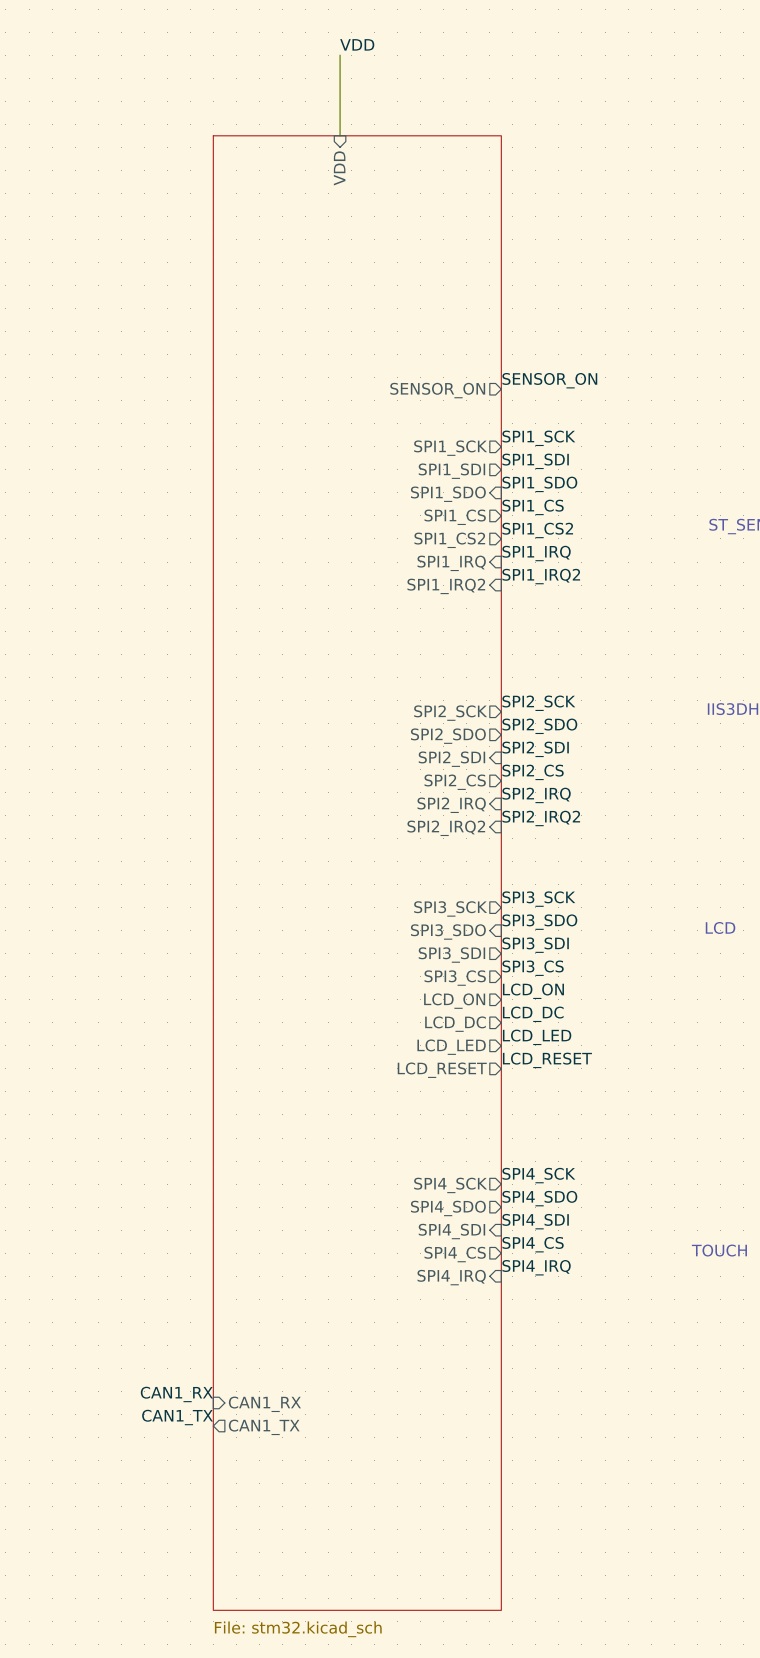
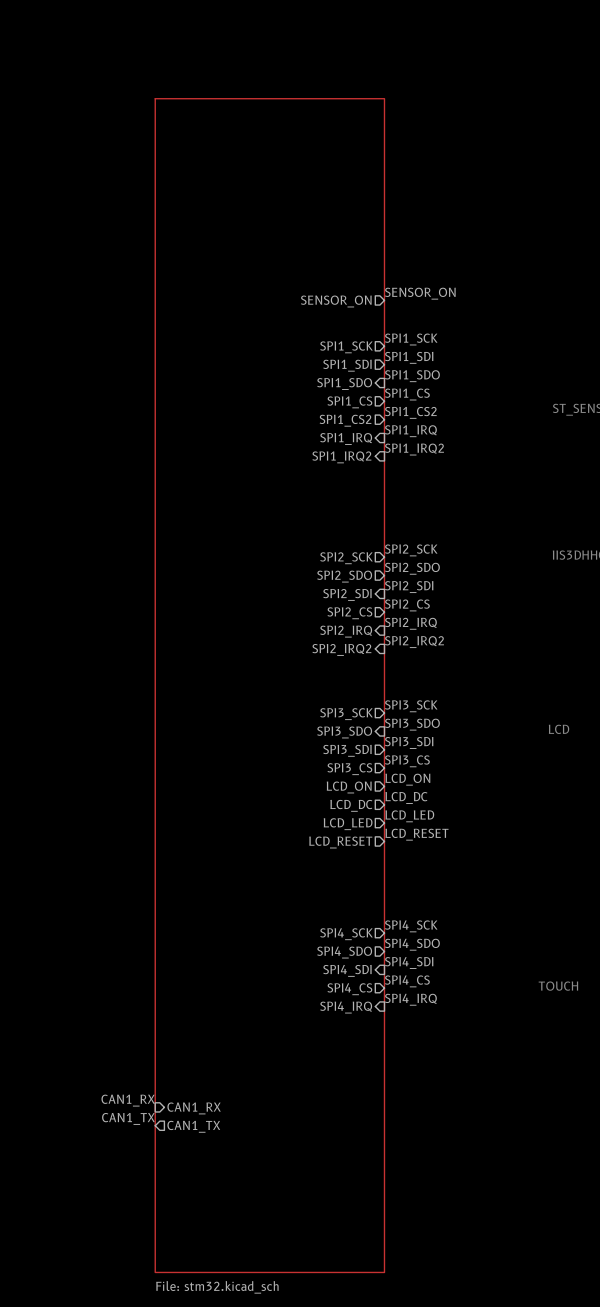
label: VDD (357, 44) -> none
wire: (340, 55) (340, 135) -> none
sheet pin: VDD (339, 168) -> none

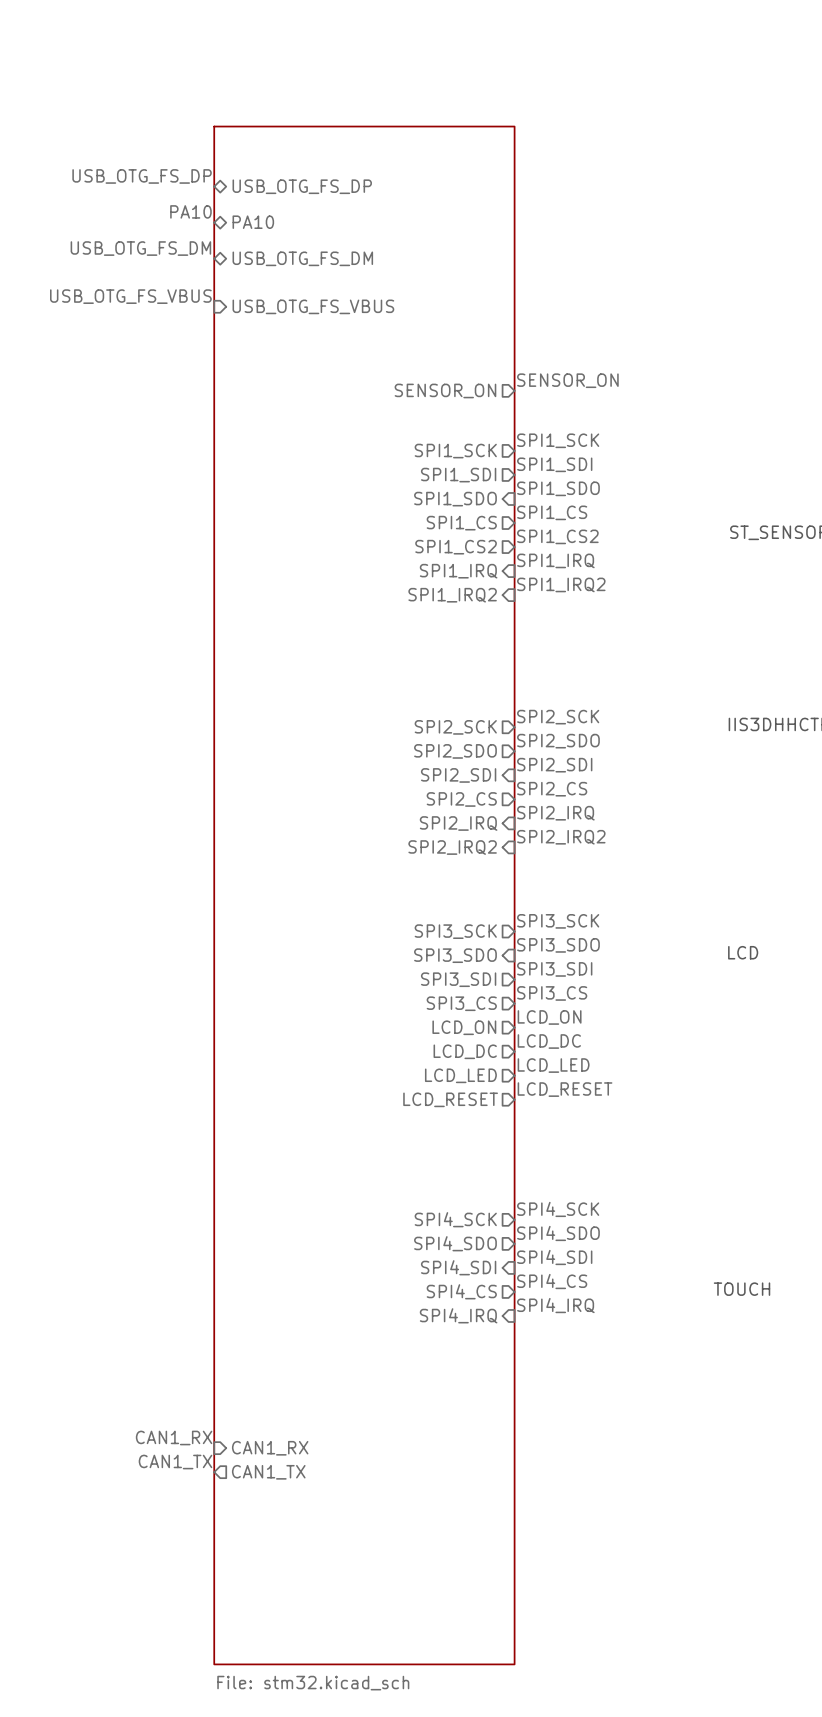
label: none -> USB_OTG_FS_DP (142, 176)
sheet pin: none -> USB_OTG_FS_DP (302, 186)
label: none -> PA10 (190, 211)
sheet pin: none -> PA10 (253, 222)
label: none -> USB_OTG_FS_DM (140, 248)
sheet pin: none -> USB_OTG_FS_DM (302, 258)
label: none -> USB_OTG_FS_VBUS (130, 296)
sheet pin: none -> USB_OTG_FS_VBUS (313, 306)

